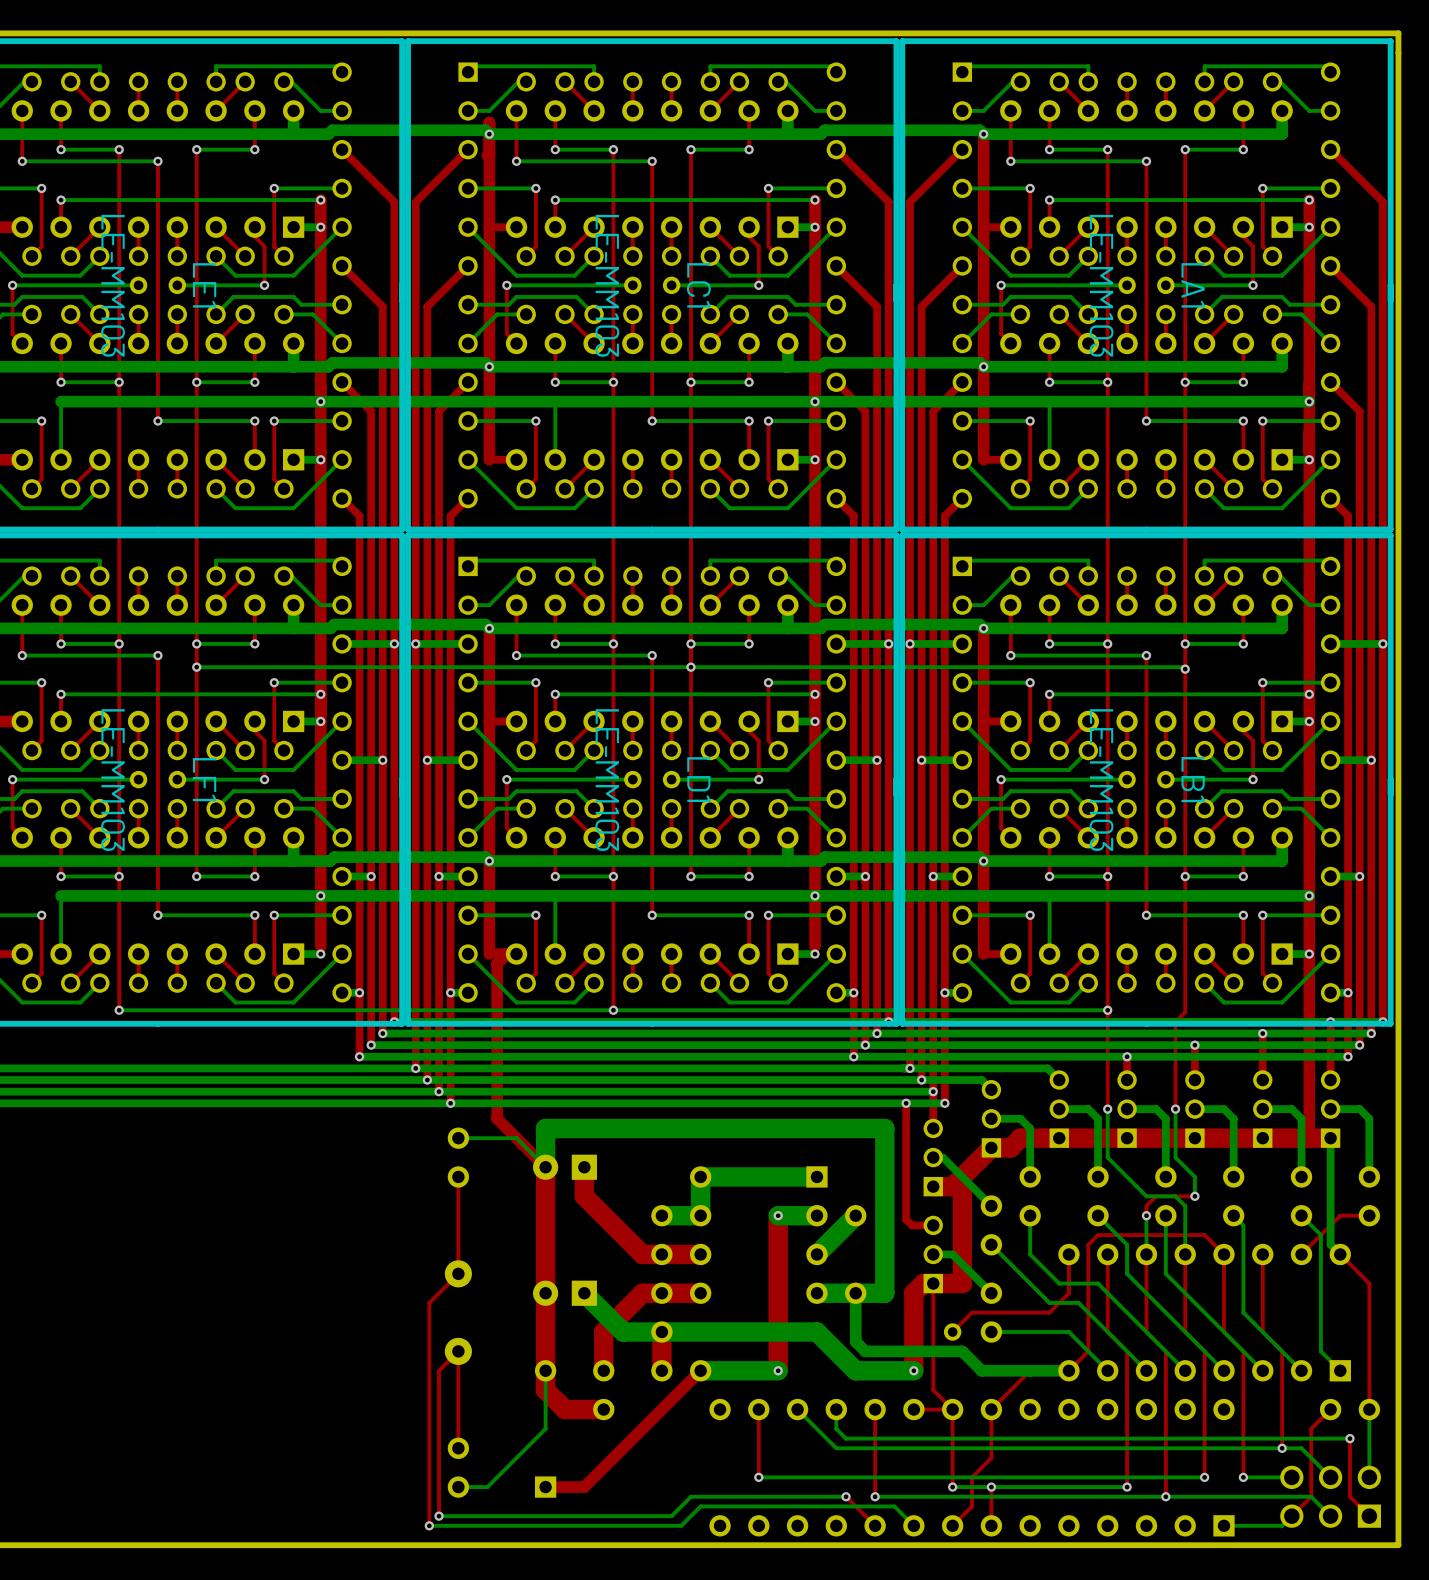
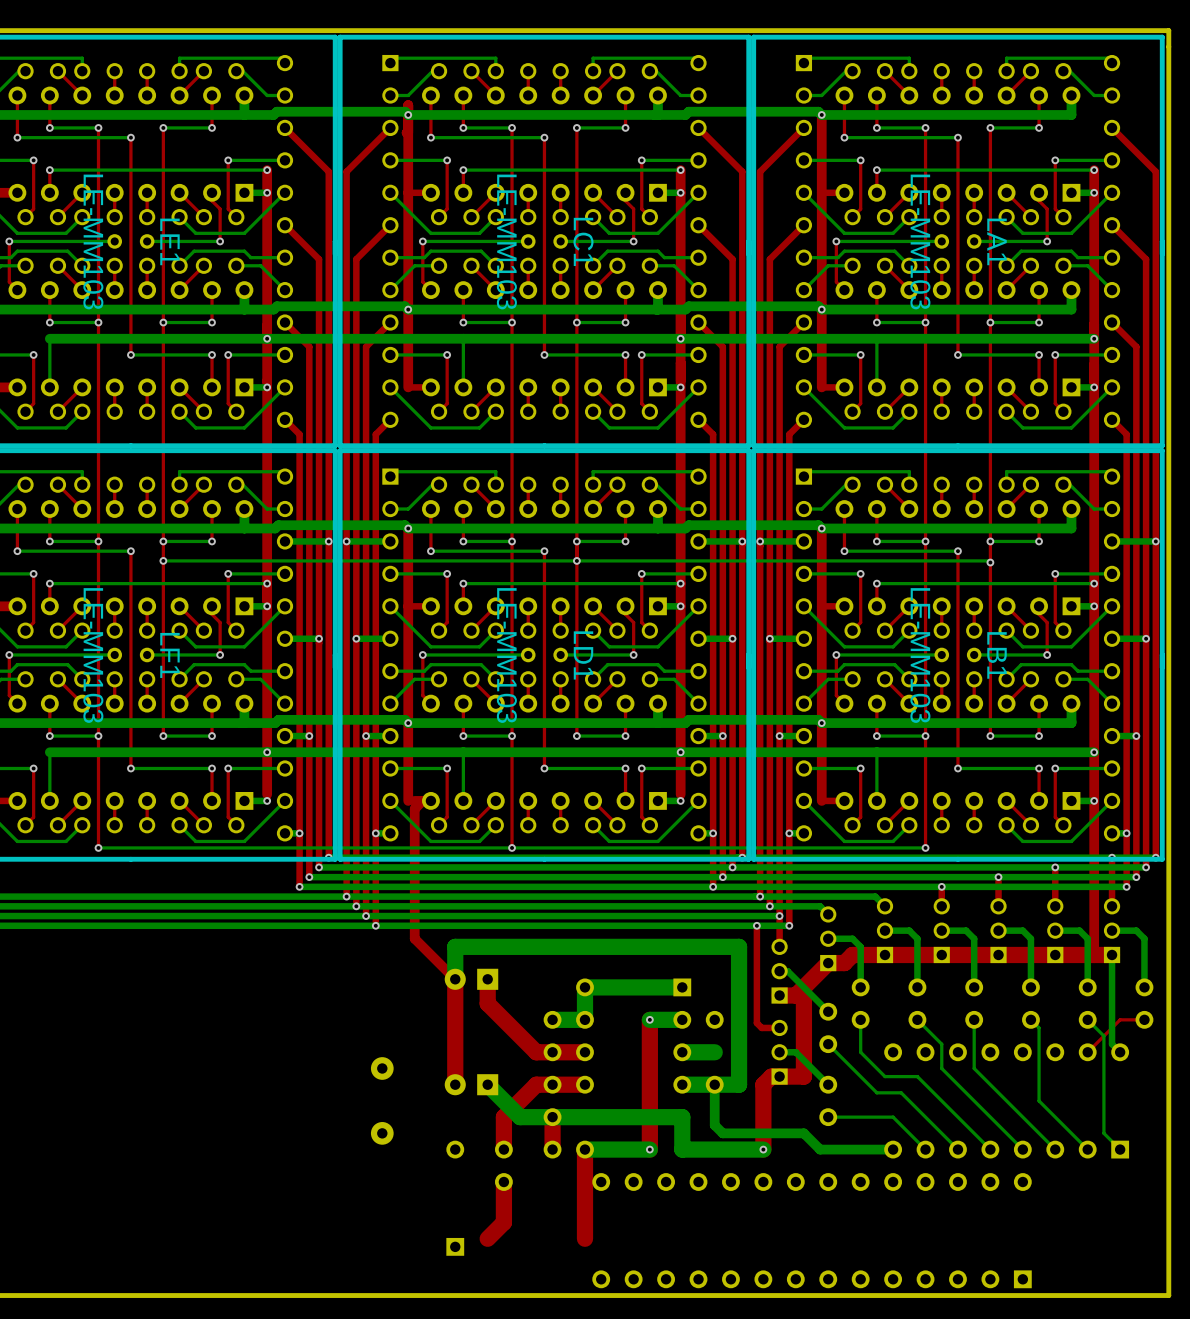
top track: (1185, 876) (1185, 1012) (1175, 1021) (1175, 1109) -> none
top track: (1107, 1010) (1107, 1109) -> none
bottom track: (1107, 1109) (1107, 1157) (1146, 1196) (1175, 1196) (1185, 1206) (1185, 1254) -> none
via: (1107, 1109) -> none
bottom track: (1175, 1109) (1175, 1157) (1194, 1176) (1194, 1196) -> none
via: (1175, 1109) -> none
bottom track: (458, 1138) (516, 1138) (545, 1167) -> none
part: (458, 1157) -> none
top track: (458, 1176) (458, 1273) (429, 1302) (429, 1525) -> none
top track: (1194, 1196) (1156, 1196) (1146, 1206) (1146, 1215) -> none
via: (1194, 1196) -> none
bottom track: (855, 1215) (816, 1254) -> (714, 1052) (682, 1052)
bottom track: (1146, 1215) (1146, 1254) -> none
via: (1146, 1215) -> none
top track: (1068, 1254) (1068, 1293) (1049, 1312) (972, 1312) (952, 1332) -> none
top track: (1107, 1254) (1107, 1332) (1127, 1351) (1127, 1487) -> none
top track: (1146, 1254) (1146, 1332) (1165, 1351) (1165, 1496) -> none
top track: (1185, 1254) (1185, 1332) (1204, 1351) (1204, 1477) -> none
top track: (1262, 1254) (1262, 1332) (1282, 1351) (1282, 1448) -> none
top track: (1340, 1254) (1369, 1283) (1369, 1409) -> none
top track: (933, 1283) (933, 1390) (952, 1409) -> none
top track: (545, 1293) (545, 1390) (564, 1409) (603, 1409) -> (487, 1238) (503, 1222) (503, 1182)
bottom track: (816, 1332) (855, 1370) -> (682, 1117) (682, 1149) (714, 1149)
part: (952, 1332) -> none
bottom track: (545, 1370) (545, 1428) (487, 1487) (458, 1487) -> none
top track: (700, 1370) (584, 1487) (545, 1487) -> (585, 1149) (585, 1238)
top track: (758, 1409) (758, 1477) -> none
bottom track: (797, 1409) (836, 1448) (1301, 1448) (1330, 1477) -> none
bottom track: (836, 1409) (836, 1428) (846, 1438) (1349, 1438) -> none
top track: (875, 1409) (875, 1496) -> none
top track: (952, 1409) (913, 1409) -> none
top track: (952, 1409) (952, 1487) -> none
top track: (1330, 1409) (1311, 1428) (1311, 1496) (1291, 1516) -> none
part: (1349, 1409) -> none
bottom track: (1369, 1409) (1369, 1477) -> none
top track: (1349, 1438) (1349, 1496) (1369, 1516) -> none
via: (1349, 1438) -> none
top track: (458, 1448) (458, 1351) (439, 1370) (439, 1516) -> none
via: (1282, 1448) -> none
part: (458, 1467) -> none
via: (758, 1477) -> none
bottom track: (1204, 1477) (758, 1477) -> none
via: (1204, 1477) -> none
top track: (1243, 1477) (1243, 1351) (1224, 1332) (1224, 1254) (1204, 1235) (1098, 1235) (1088, 1244) (1088, 1351) (1068, 1370) (1030, 1370) (991, 1409) (991, 1457) (972, 1477) (972, 1506) (952, 1525) -> none
via: (1243, 1477) -> none
bottom track: (1291, 1477) (1243, 1477) -> none
via: (952, 1487) -> none
top track: (991, 1487) (991, 1525) -> none
via: (991, 1487) -> none
bottom track: (1127, 1487) (952, 1487) -> none
via: (1127, 1487) -> none
top track: (846, 1496) (875, 1525) -> none
bottom track: (846, 1496) (690, 1496) (671, 1516) (439, 1516) -> none
via: (846, 1496) -> none
bottom track: (875, 1496) (1311, 1496) (1330, 1516) -> none
via: (875, 1496) -> none
via: (1165, 1496) -> none
part: (1330, 1496) -> none
via: (439, 1516) -> none
bottom track: (1291, 1516) (1282, 1525) (1224, 1525) -> none
via: (429, 1525) -> none
bottom track: (913, 1525) (894, 1506) (700, 1506) (681, 1525) (429, 1525) -> none

